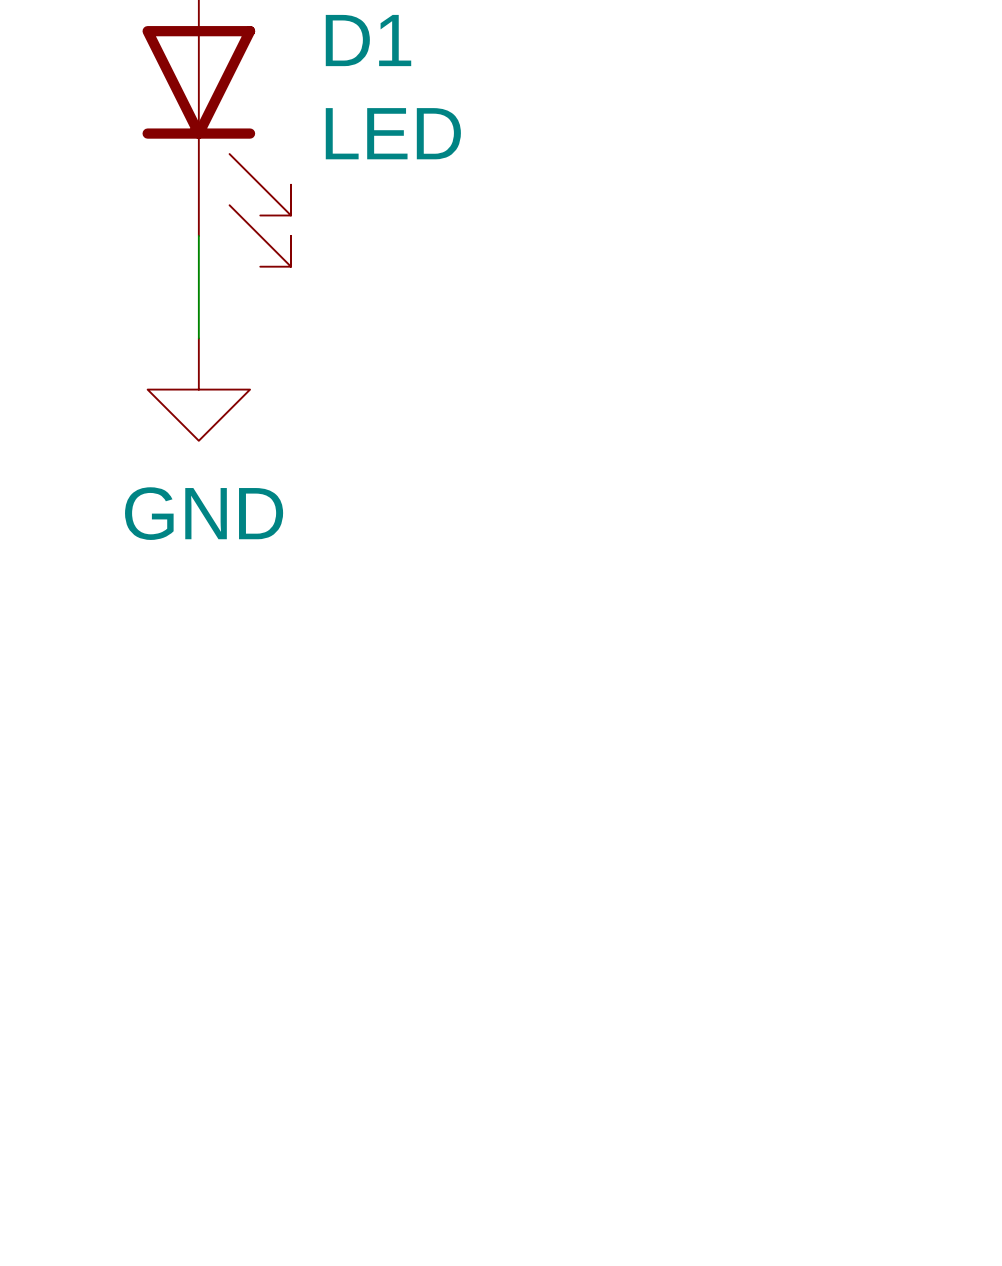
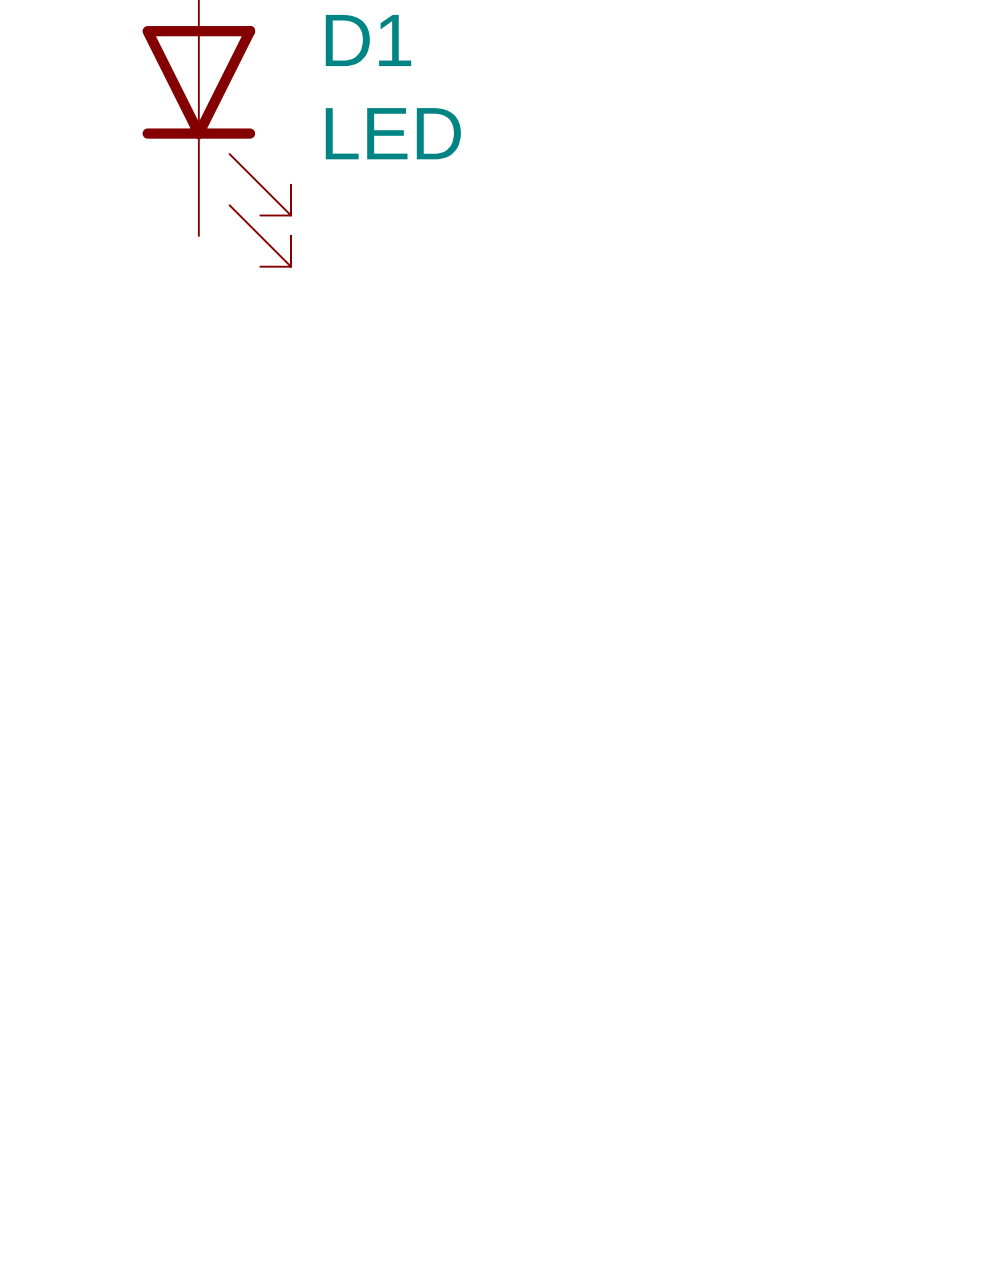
wire: (198, 235) (198, 338) -> none
power symbol: GND (198, 389) -> none

